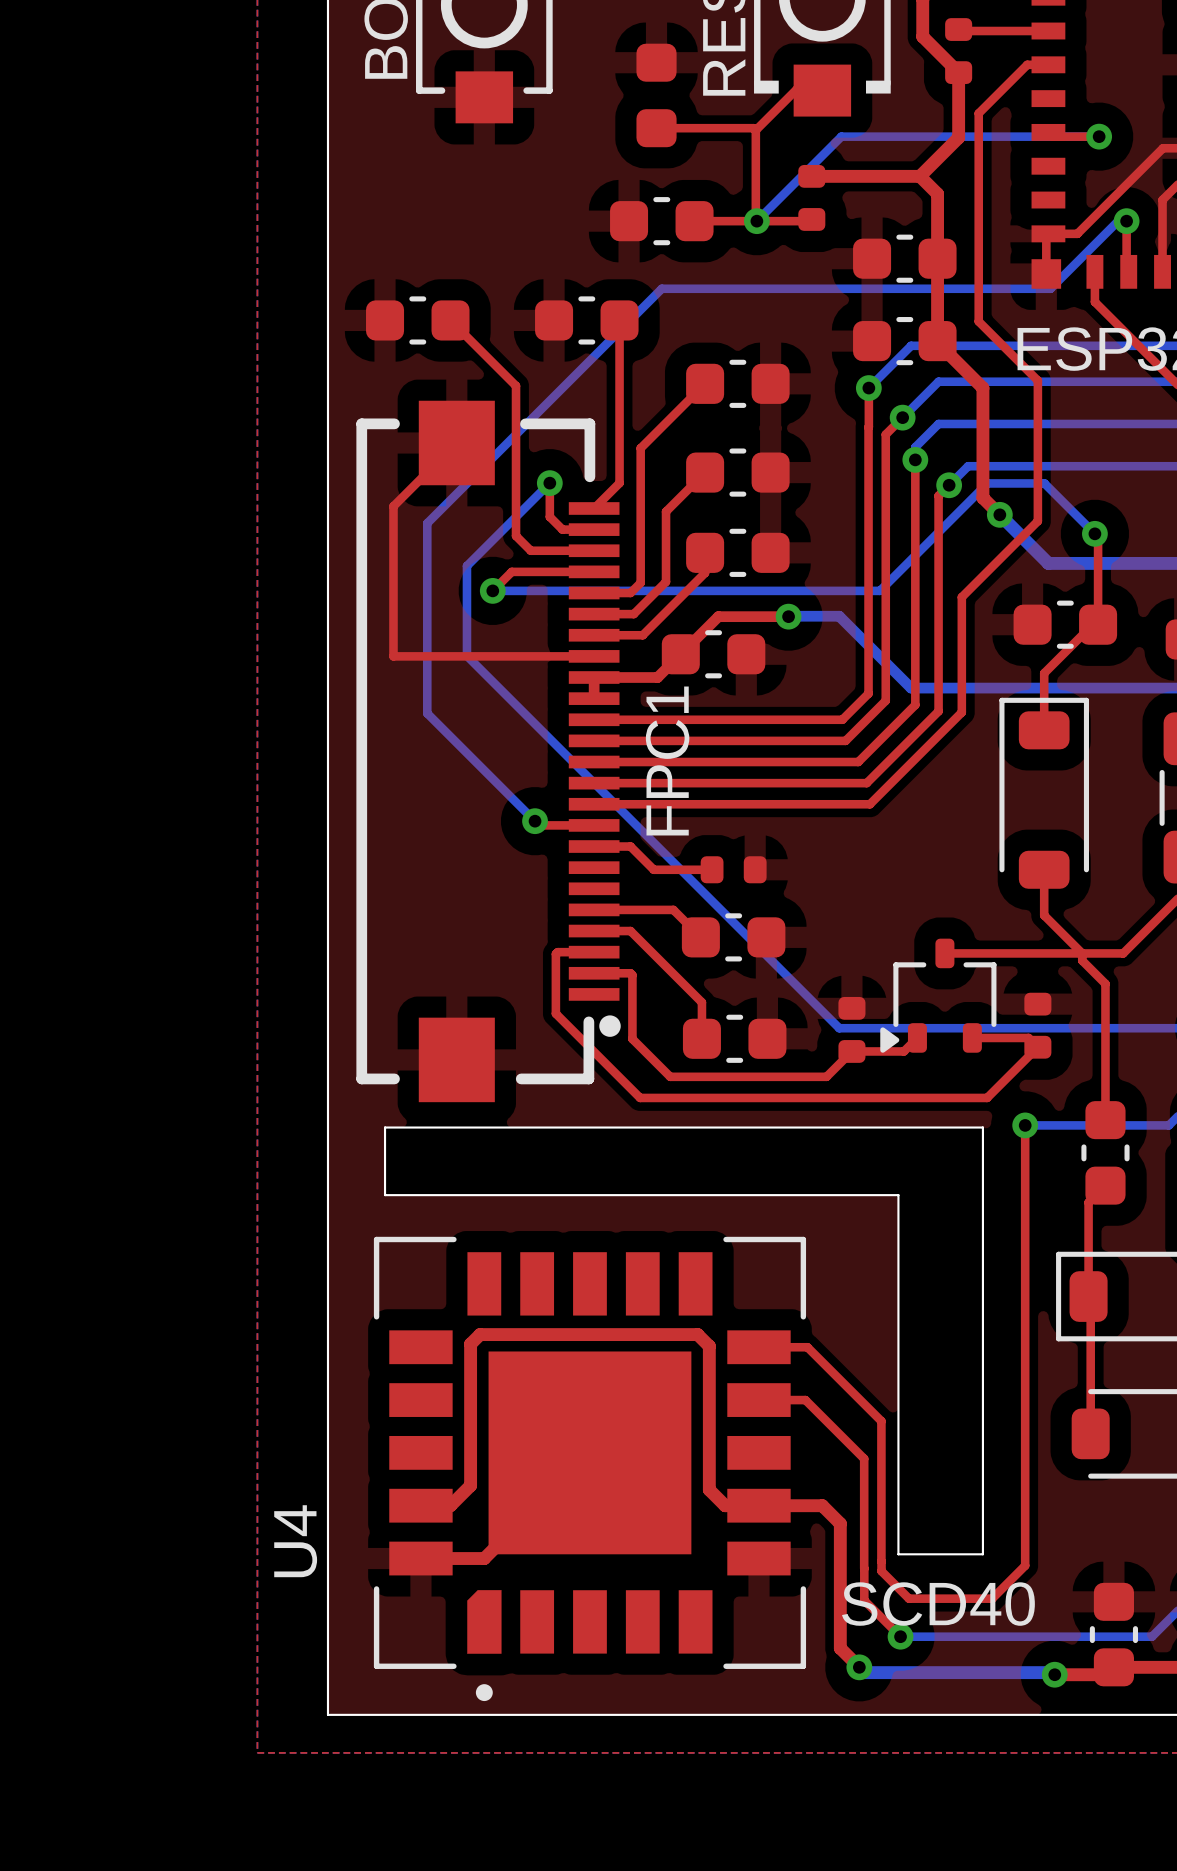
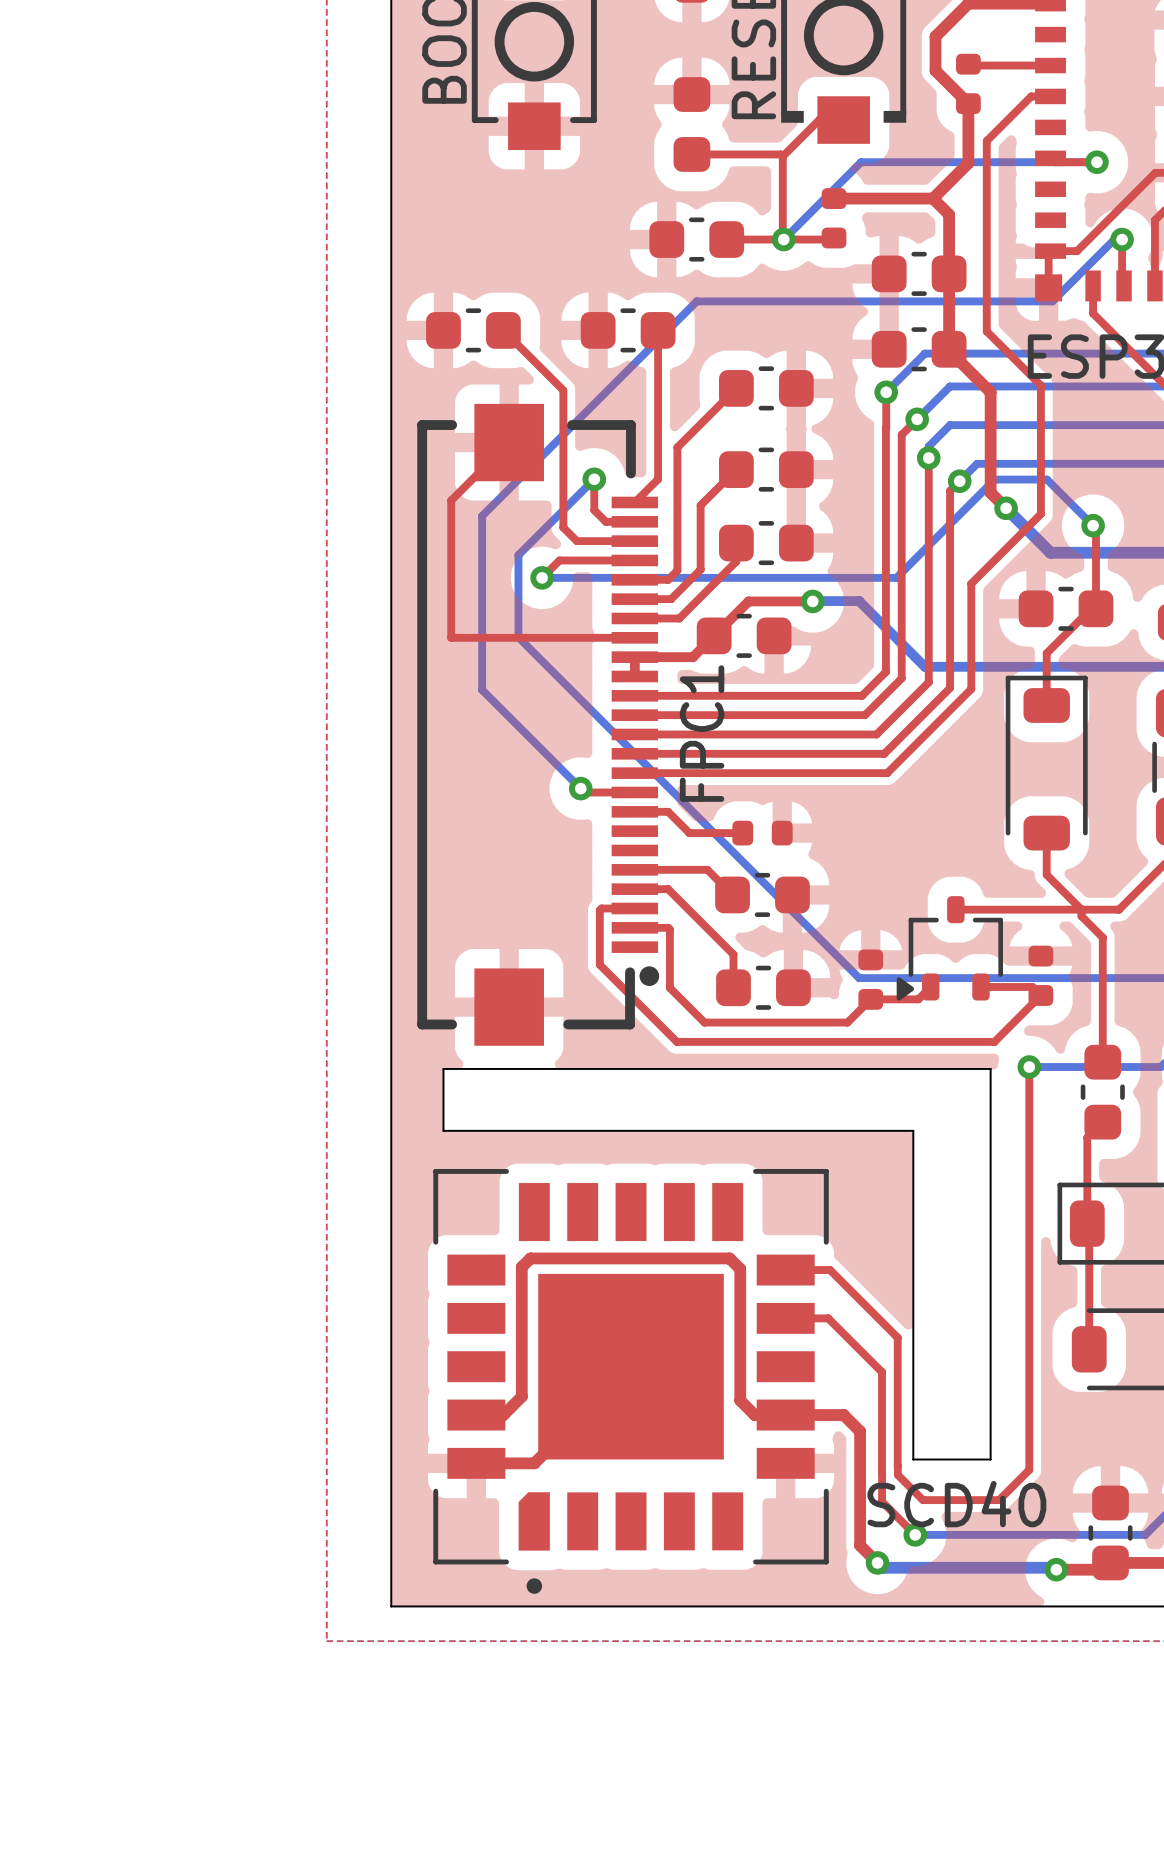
U4 name: U4 (295, 1541) -> none

